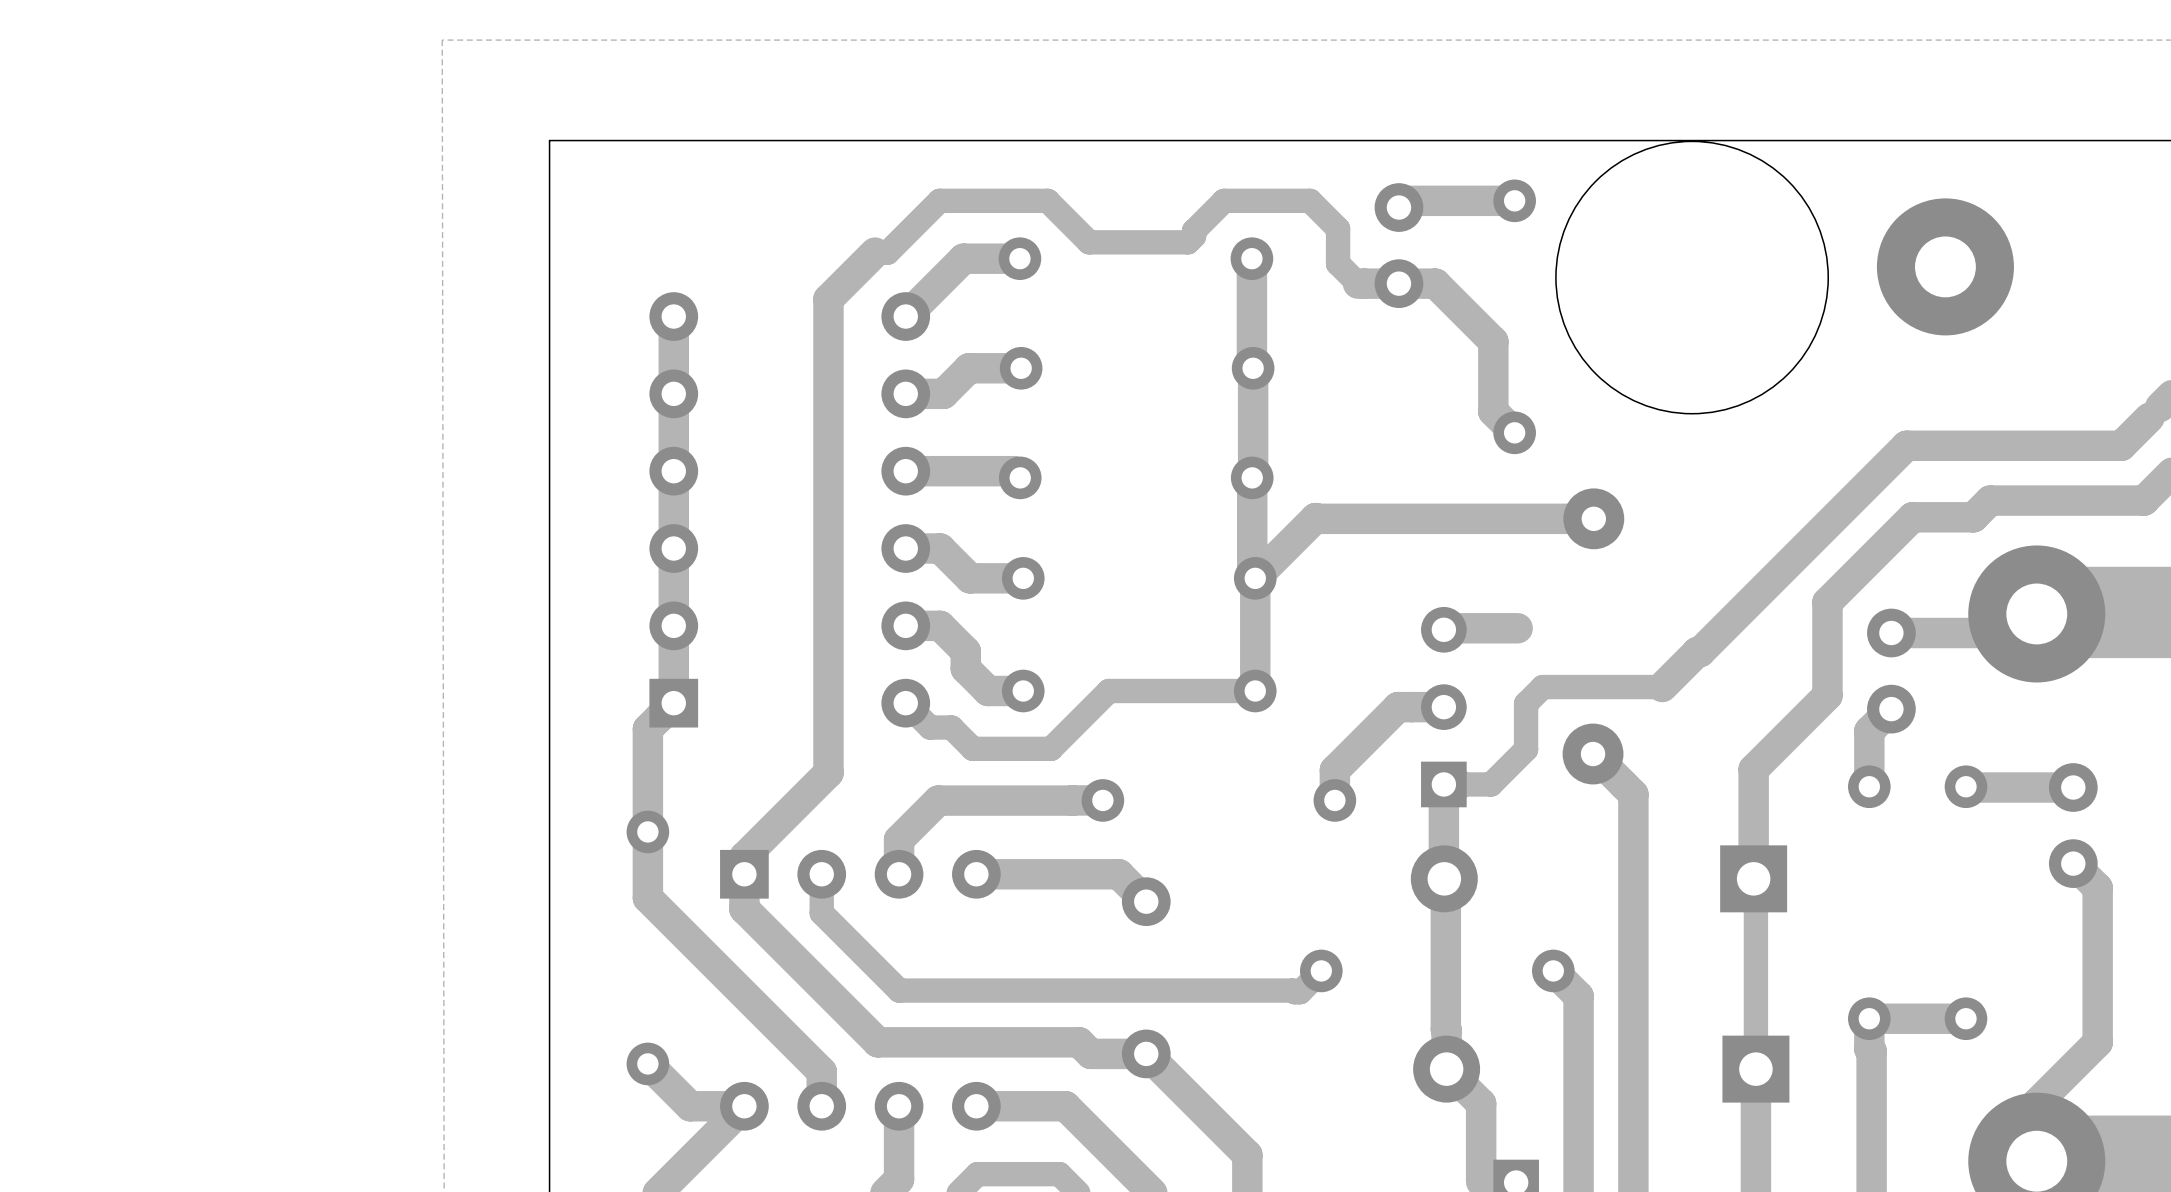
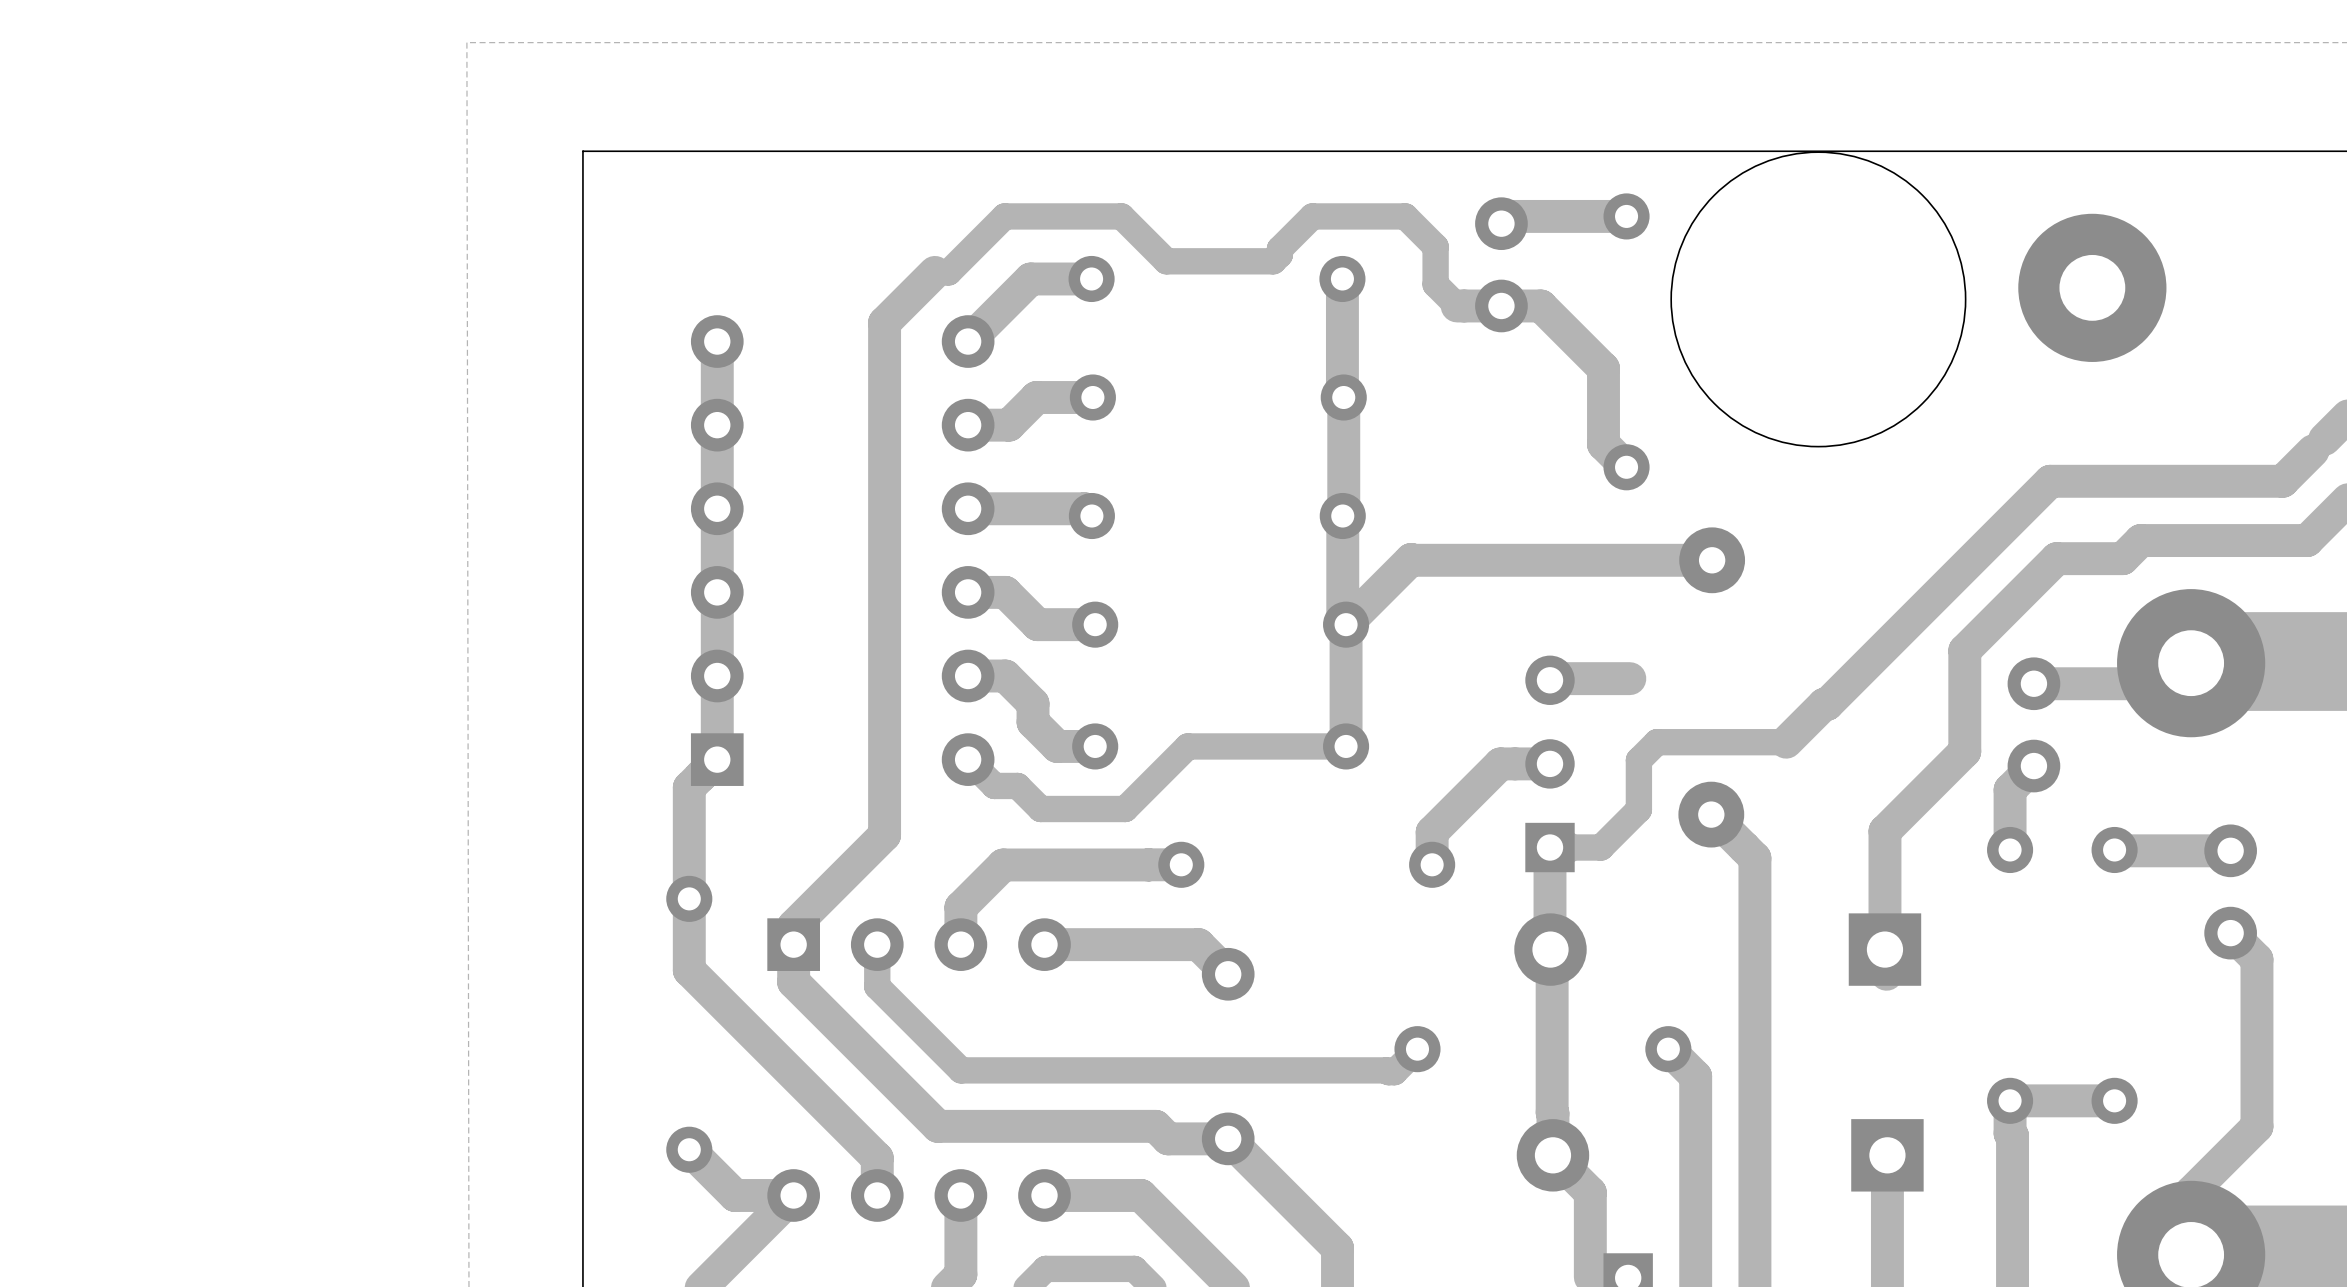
track: (1753, 878) (1755, 881) (1755, 1069) -> none

